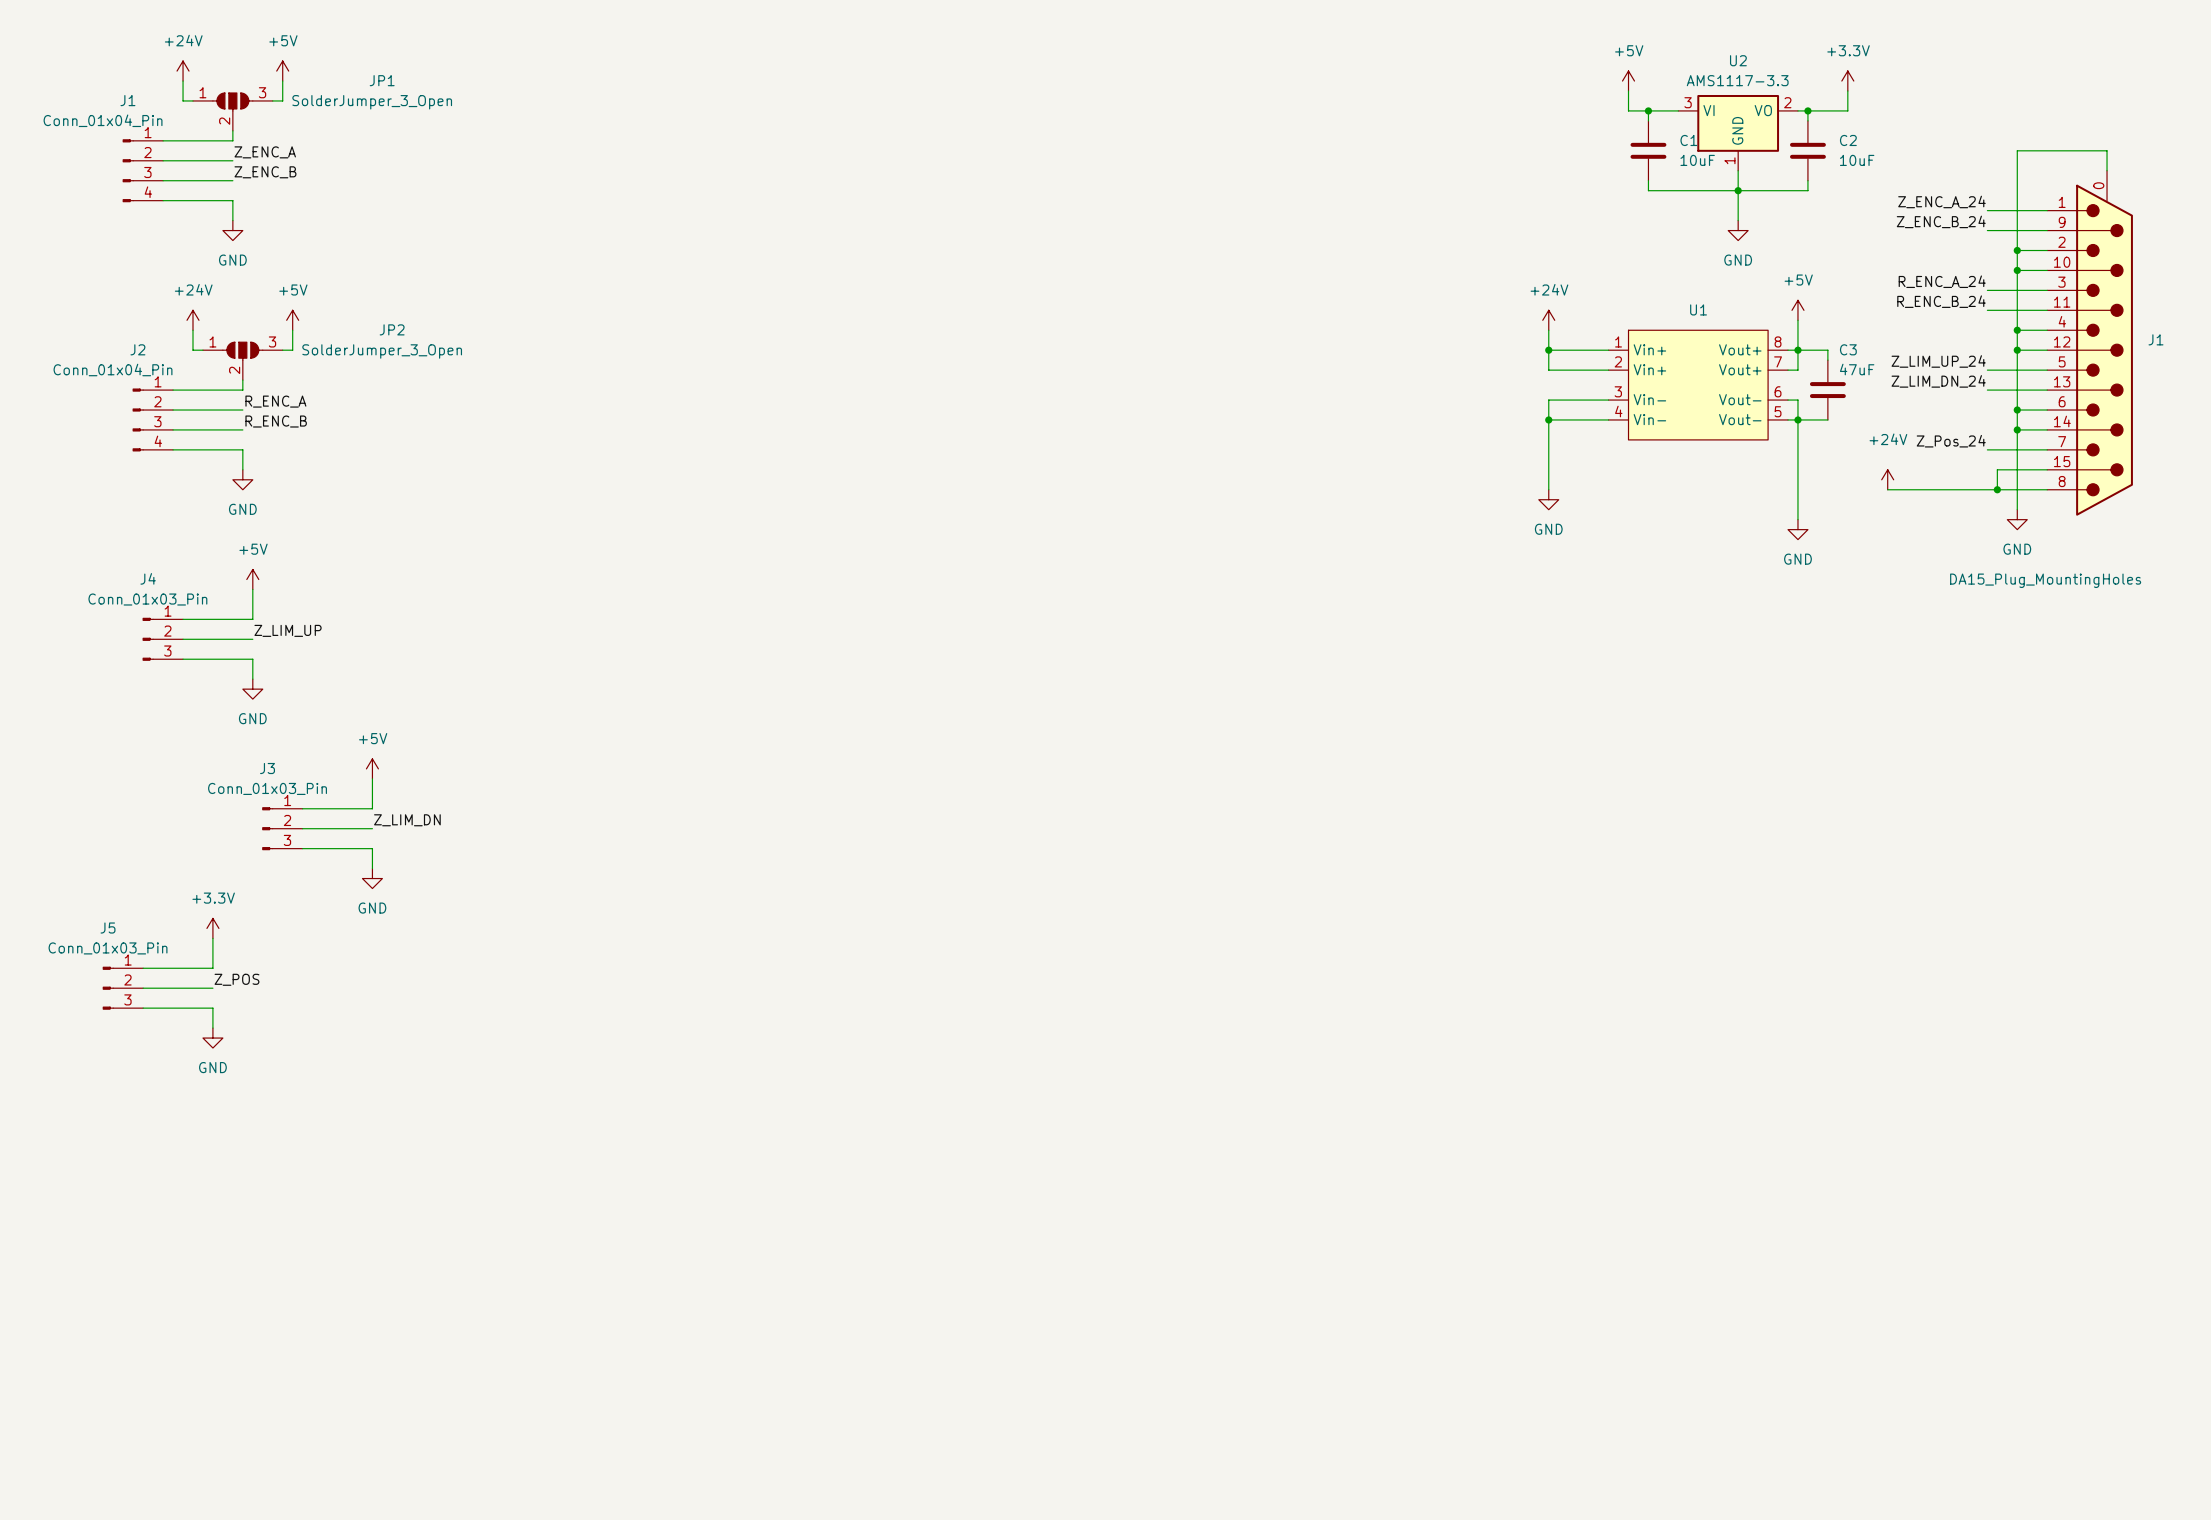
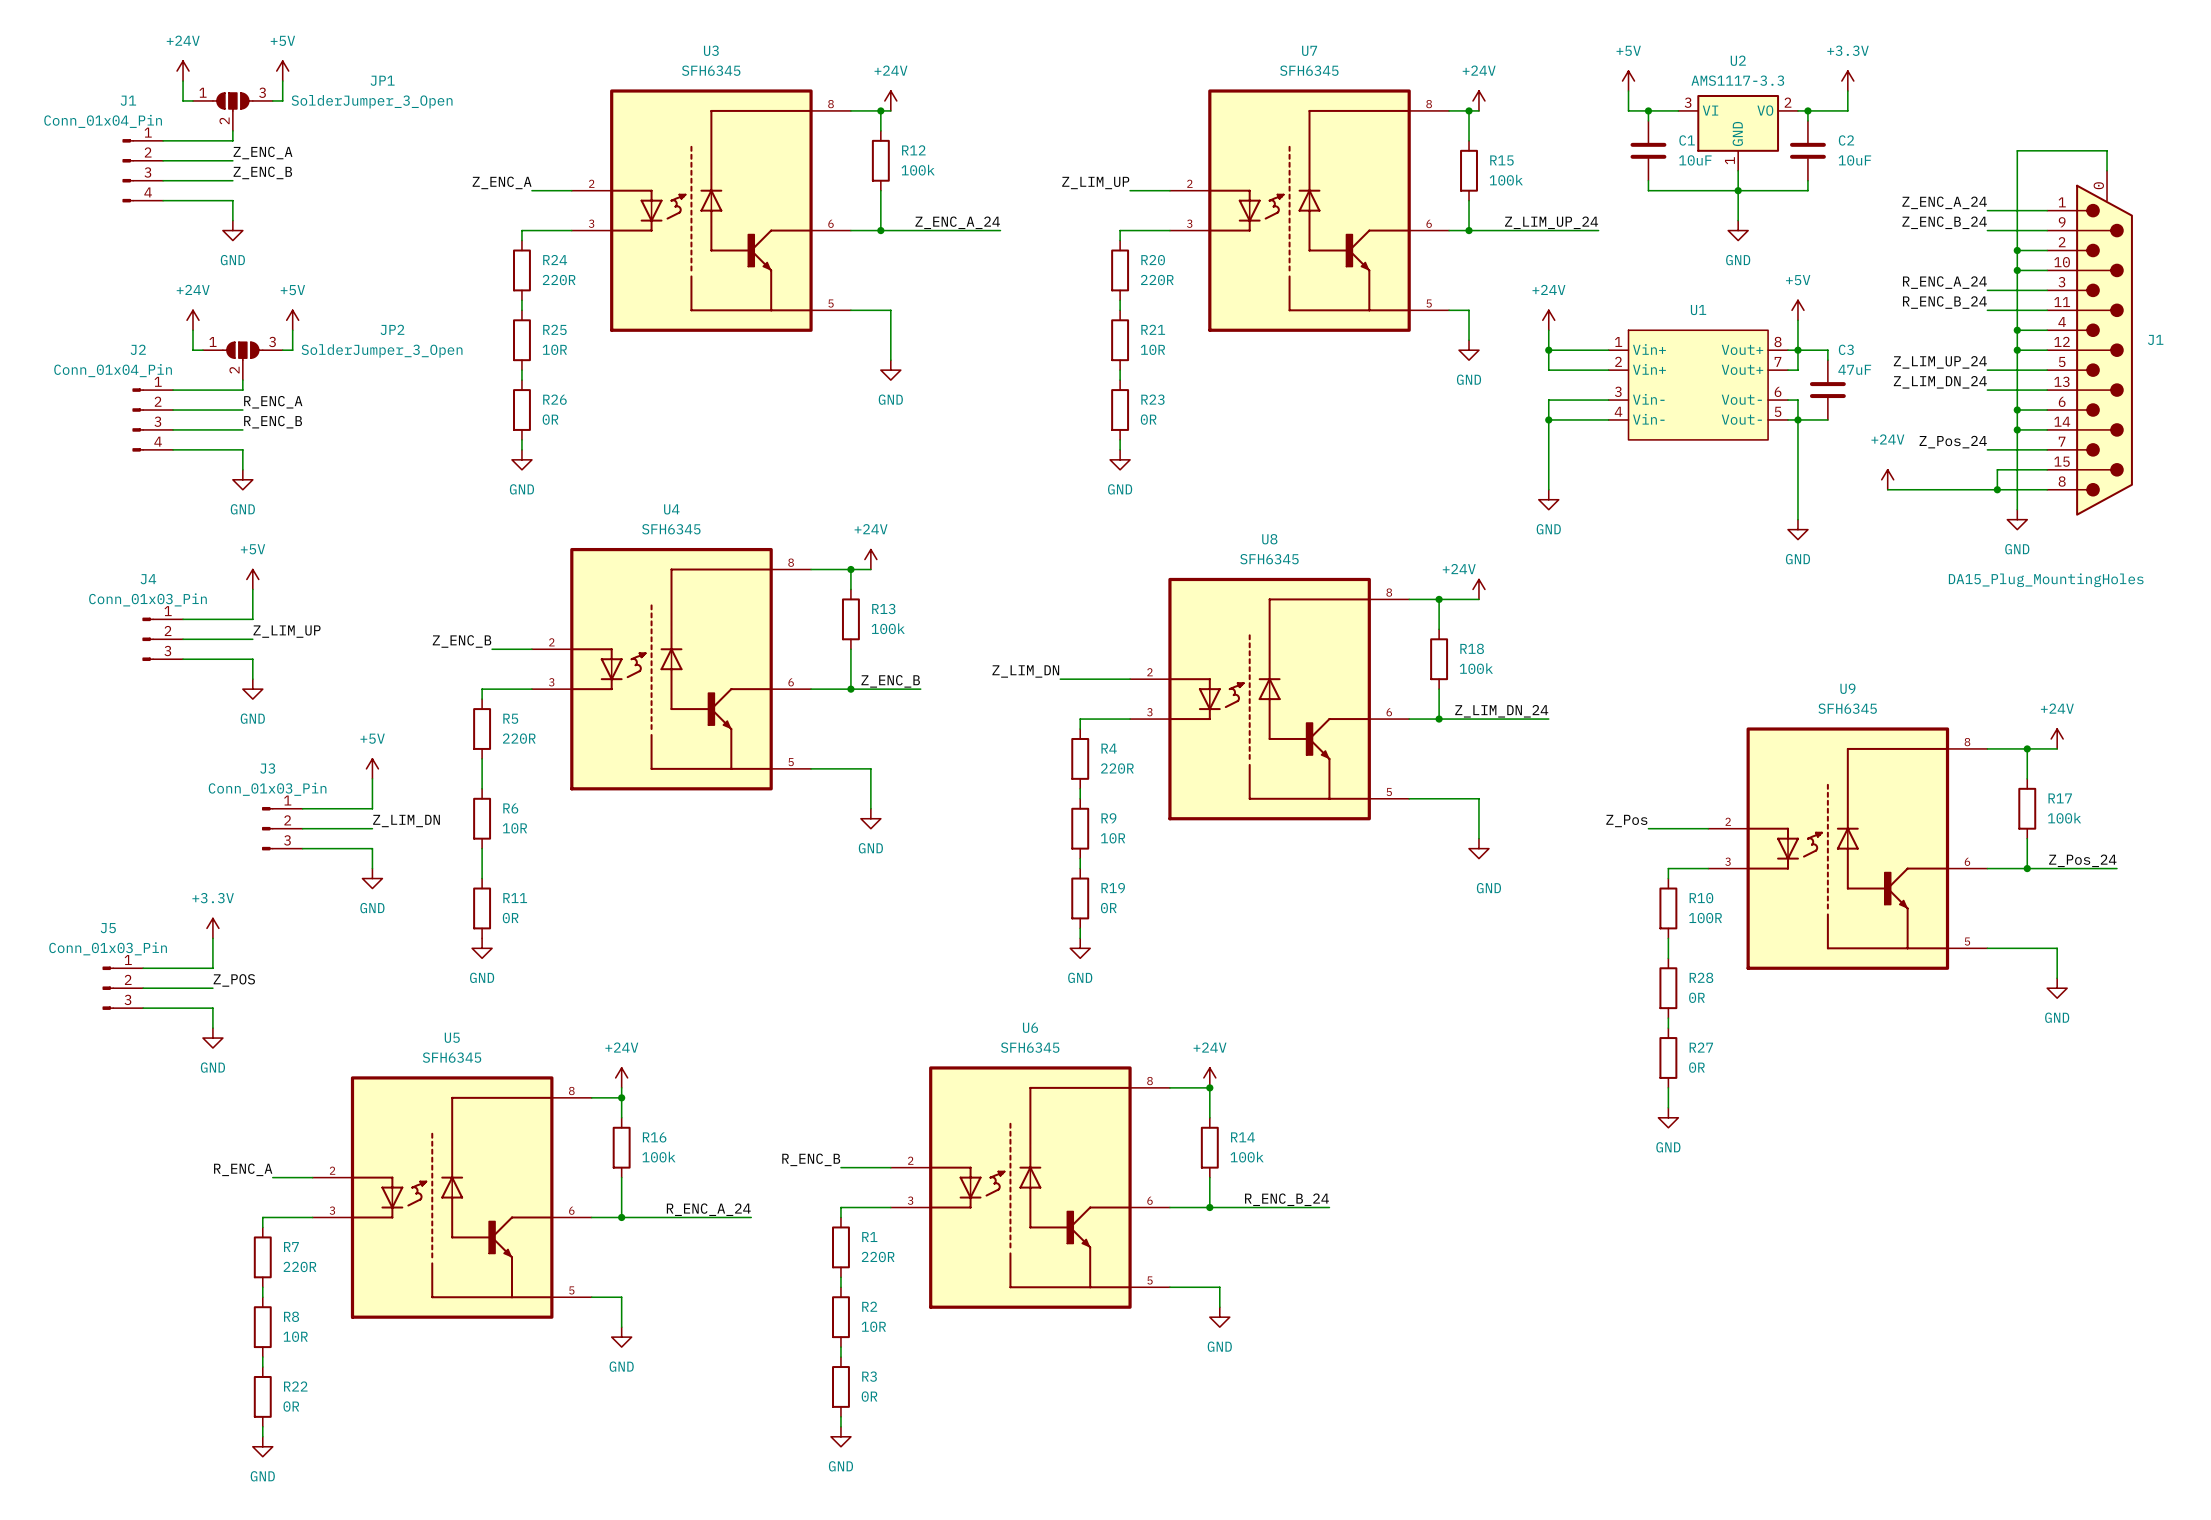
power symbol: none -> +24V (890, 100)
power symbol: none -> +24V (1478, 100)
wire: none -> (850, 110) (890, 110)
wire: none -> (880, 110) (880, 130)
junction: none -> (880, 110)
wire: none -> (1449, 110) (1478, 110)
wire: none -> (1469, 110) (1469, 140)
junction: none -> (1469, 110)
R12: none -> 100k (880, 160)
R15: none -> 100k (1469, 170)
label: none -> Z_ENC_A (502, 182)
label: none -> Z_LIM_UP (1095, 183)
wire: none -> (531, 190) (571, 190)
wire: none -> (880, 190) (880, 230)
wire: none -> (1130, 190) (1169, 190)
wire: none -> (1469, 200) (1469, 230)
U3: none -> SFH6345 (711, 210)
U7: none -> SFH6345 (1309, 210)
label: none -> Z_ENC_A_24 (957, 222)
label: none -> Z_LIM_UP_24 (1551, 222)
wire: none -> (571, 230) (521, 230) (521, 240)
wire: none -> (850, 230) (1000, 230)
junction: none -> (880, 230)
wire: none -> (1169, 230) (1120, 230) (1120, 240)
wire: none -> (1449, 230) (1598, 230)
junction: none -> (1469, 230)
R24: none -> 220R (521, 270)
R20: none -> 220R (1120, 270)
wire: none -> (521, 300) (521, 310)
wire: none -> (1120, 300) (1120, 310)
wire: none -> (850, 310) (890, 310) (890, 360)
wire: none -> (1449, 310) (1469, 310) (1469, 340)
R25: none -> 10R (521, 340)
R21: none -> 10R (1120, 340)
power symbol: none -> GND (1469, 350)
wire: none -> (521, 370) (521, 380)
power symbol: none -> GND (890, 370)
wire: none -> (1120, 370) (1120, 380)
R26: none -> 0R (521, 410)
R23: none -> 0R (1120, 410)
wire: none -> (521, 439) (521, 449)
wire: none -> (1120, 439) (1120, 449)
power symbol: none -> GND (521, 459)
power symbol: none -> GND (1120, 459)
power symbol: none -> +24V (870, 559)
wire: none -> (811, 569) (870, 569)
wire: none -> (850, 569) (850, 589)
junction: none -> (850, 569)
power symbol: none -> +24V (1478, 589)
wire: none -> (1409, 599) (1478, 599)
wire: none -> (1439, 599) (1439, 629)
junction: none -> (1439, 599)
R13: none -> 100k (850, 619)
label: none -> Z_ENC_B (462, 641)
wire: none -> (492, 649) (531, 649)
wire: none -> (850, 649) (850, 689)
R18: none -> 100k (1439, 659)
U4: none -> SFH6345 (671, 669)
label: none -> Z_LIM_DN (1025, 671)
wire: none -> (1060, 679) (1130, 679)
label: none -> Z_ENC_B (890, 681)
wire: none -> (531, 689) (482, 689) (482, 699)
wire: none -> (811, 689) (920, 689)
junction: none -> (850, 689)
wire: none -> (1439, 689) (1439, 719)
U8: none -> SFH6345 (1269, 699)
label: none -> Z_LIM_DN_24 (1501, 711)
wire: none -> (1130, 719) (1080, 719) (1080, 729)
wire: none -> (1409, 719) (1548, 719)
junction: none -> (1439, 719)
R5: none -> 220R (482, 729)
power symbol: none -> +24V (2057, 738)
wire: none -> (1987, 748) (2057, 748)
wire: none -> (2027, 748) (2027, 778)
junction: none -> (2027, 748)
wire: none -> (482, 758) (482, 788)
R4: none -> 220R (1080, 758)
wire: none -> (811, 768) (870, 768) (870, 808)
wire: none -> (1080, 788) (1080, 798)
wire: none -> (1409, 798) (1478, 798) (1478, 838)
R17: none -> 100k (2027, 808)
R6: none -> 10R (482, 818)
power symbol: none -> GND (870, 818)
label: none -> Z_Pos (1626, 821)
R9: none -> 10R (1080, 828)
wire: none -> (1648, 828) (1708, 828)
wire: none -> (2027, 838) (2027, 868)
wire: none -> (482, 848) (482, 878)
power symbol: none -> GND (1478, 848)
U9: none -> SFH6345 (1847, 848)
wire: none -> (1080, 858) (1080, 868)
label: none -> Z_Pos_24 (2082, 860)
wire: none -> (1708, 868) (1668, 868) (1668, 878)
wire: none -> (1987, 868) (2116, 868)
junction: none -> (2027, 868)
R19: none -> 0R (1080, 898)
R11: none -> 0R (482, 908)
R10: none -> 100R (1668, 908)
wire: none -> (1080, 928) (1080, 938)
wire: none -> (1668, 938) (1668, 958)
power symbol: none -> GND (482, 948)
power symbol: none -> GND (1080, 948)
wire: none -> (1987, 948) (2057, 948) (2057, 978)
R28: none -> 0R (1668, 988)
power symbol: none -> GND (2057, 988)
wire: none -> (1668, 1018) (1668, 1028)
R27: none -> 0R (1668, 1057)
power symbol: none -> +24V (621, 1077)
power symbol: none -> +24V (1209, 1077)
wire: none -> (621, 1087) (621, 1117)
wire: none -> (1169, 1087) (1209, 1087) (1209, 1117)
junction: none -> (1209, 1087)
wire: none -> (1668, 1087) (1668, 1107)
wire: none -> (591, 1097) (621, 1097)
junction: none -> (621, 1097)
power symbol: none -> GND (1668, 1117)
R16: none -> 100k (621, 1147)
R14: none -> 100k (1209, 1147)
label: none -> R_ENC_B (811, 1159)
wire: none -> (840, 1167) (890, 1167)
label: none -> R_ENC_A (243, 1169)
wire: none -> (272, 1177) (312, 1177)
wire: none -> (621, 1177) (621, 1217)
wire: none -> (1209, 1177) (1209, 1207)
U6: none -> SFH6345 (1030, 1187)
U5: none -> SFH6345 (452, 1197)
label: none -> R_ENC_B_24 (1286, 1199)
wire: none -> (890, 1207) (840, 1207) (840, 1217)
wire: none -> (1169, 1207) (1329, 1207)
junction: none -> (1209, 1207)
label: none -> R_ENC_A_24 (708, 1209)
wire: none -> (312, 1217) (262, 1217) (262, 1227)
wire: none -> (591, 1217) (751, 1217)
junction: none -> (621, 1217)
R1: none -> 220R (840, 1247)
R7: none -> 220R (262, 1257)
wire: none -> (840, 1277) (840, 1287)
wire: none -> (262, 1287) (262, 1297)
wire: none -> (1169, 1287) (1219, 1287) (1219, 1307)
wire: none -> (591, 1297) (621, 1297) (621, 1327)
R2: none -> 10R (840, 1317)
power symbol: none -> GND (1219, 1317)
R8: none -> 10R (262, 1327)
power symbol: none -> GND (621, 1337)
wire: none -> (840, 1347) (840, 1357)
wire: none -> (262, 1357) (262, 1367)
R3: none -> 0R (840, 1386)
R22: none -> 0R (262, 1396)
wire: none -> (840, 1416) (840, 1426)
wire: none -> (262, 1426) (262, 1436)
power symbol: none -> GND (840, 1436)
power symbol: none -> GND (262, 1446)

